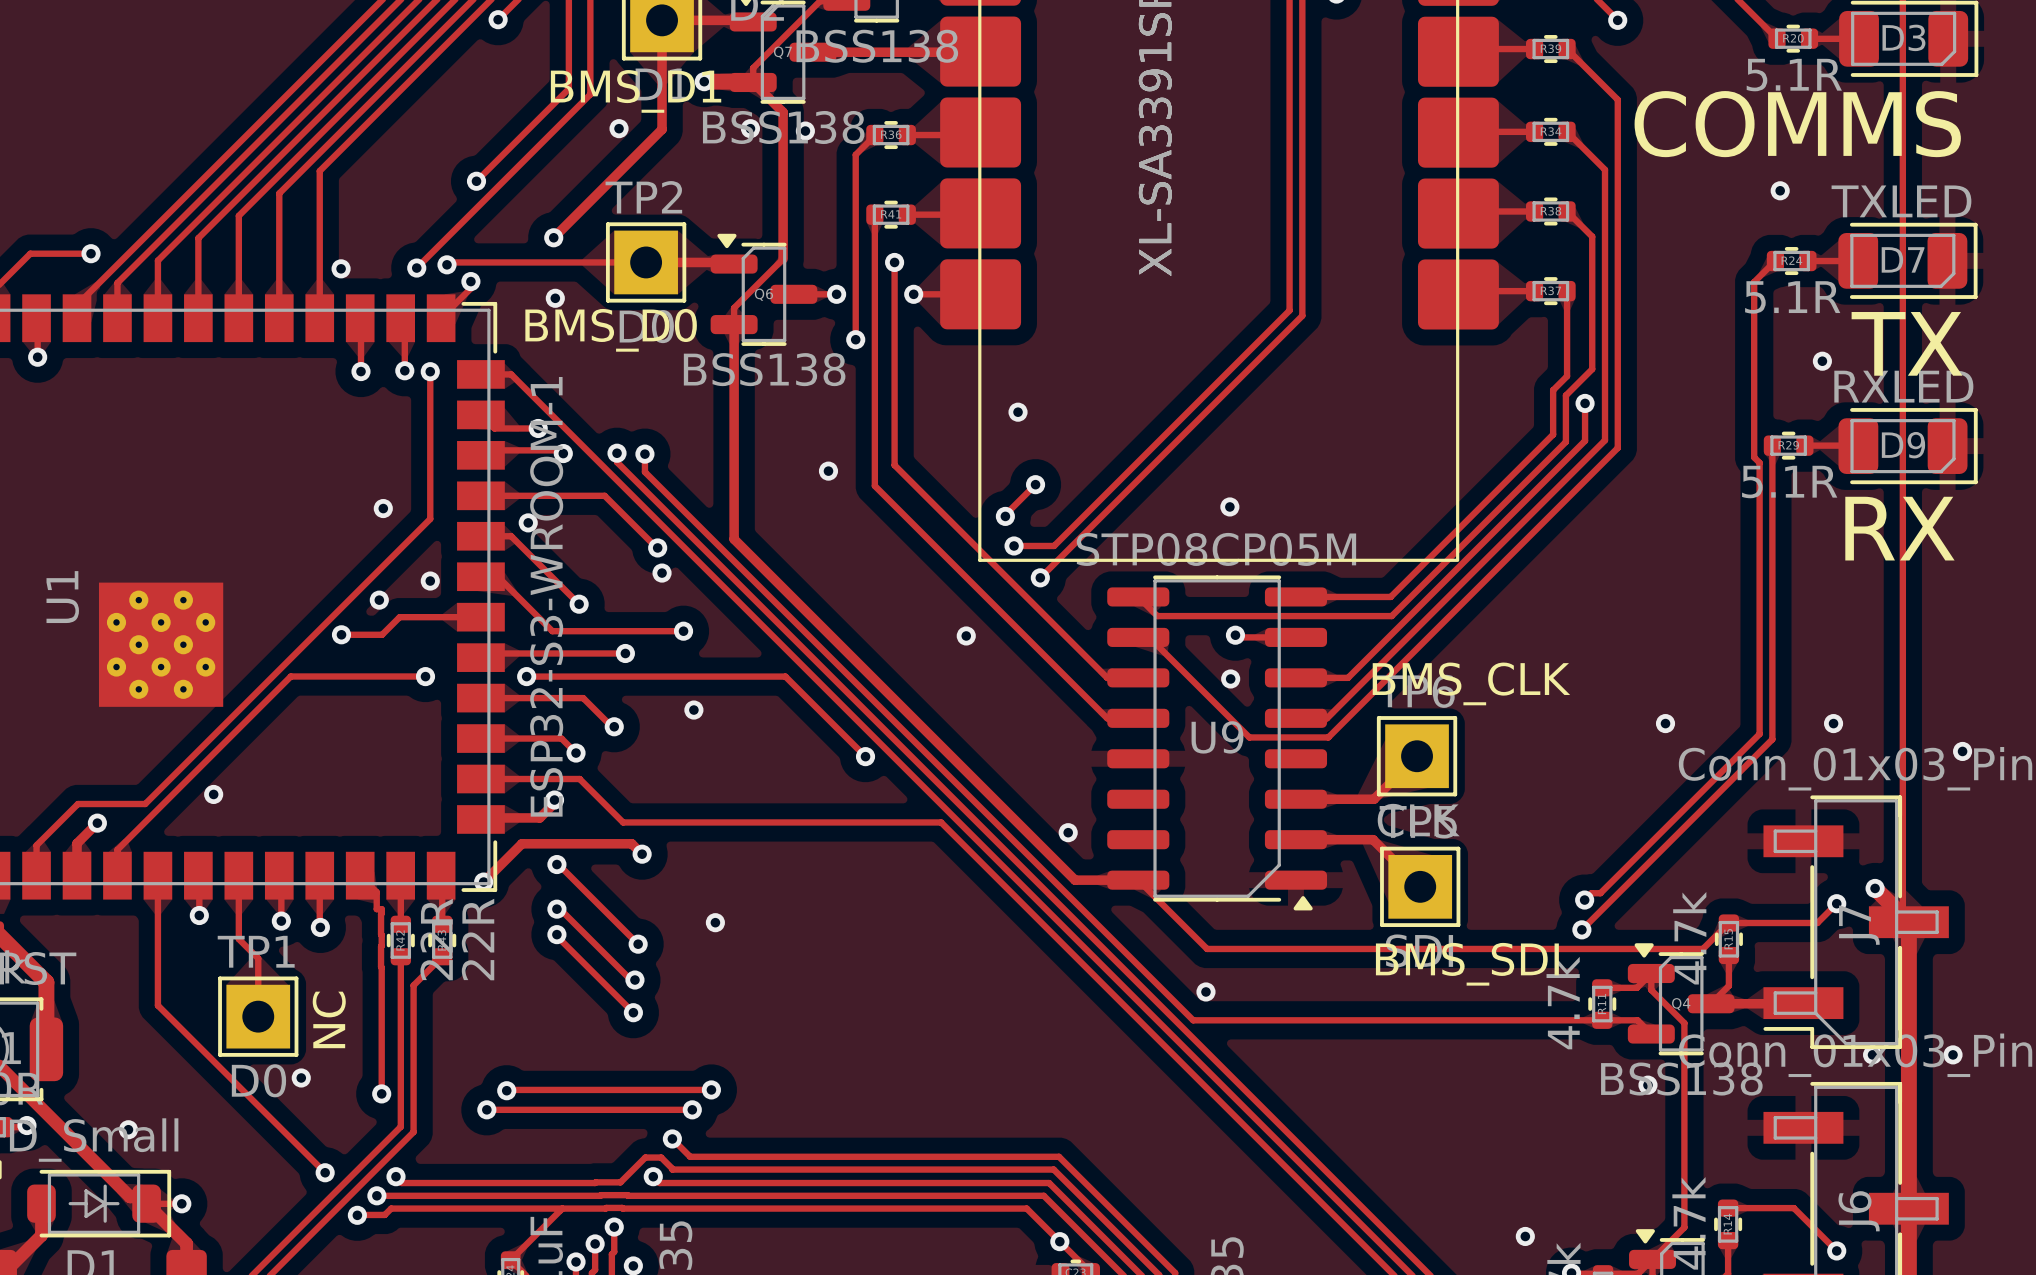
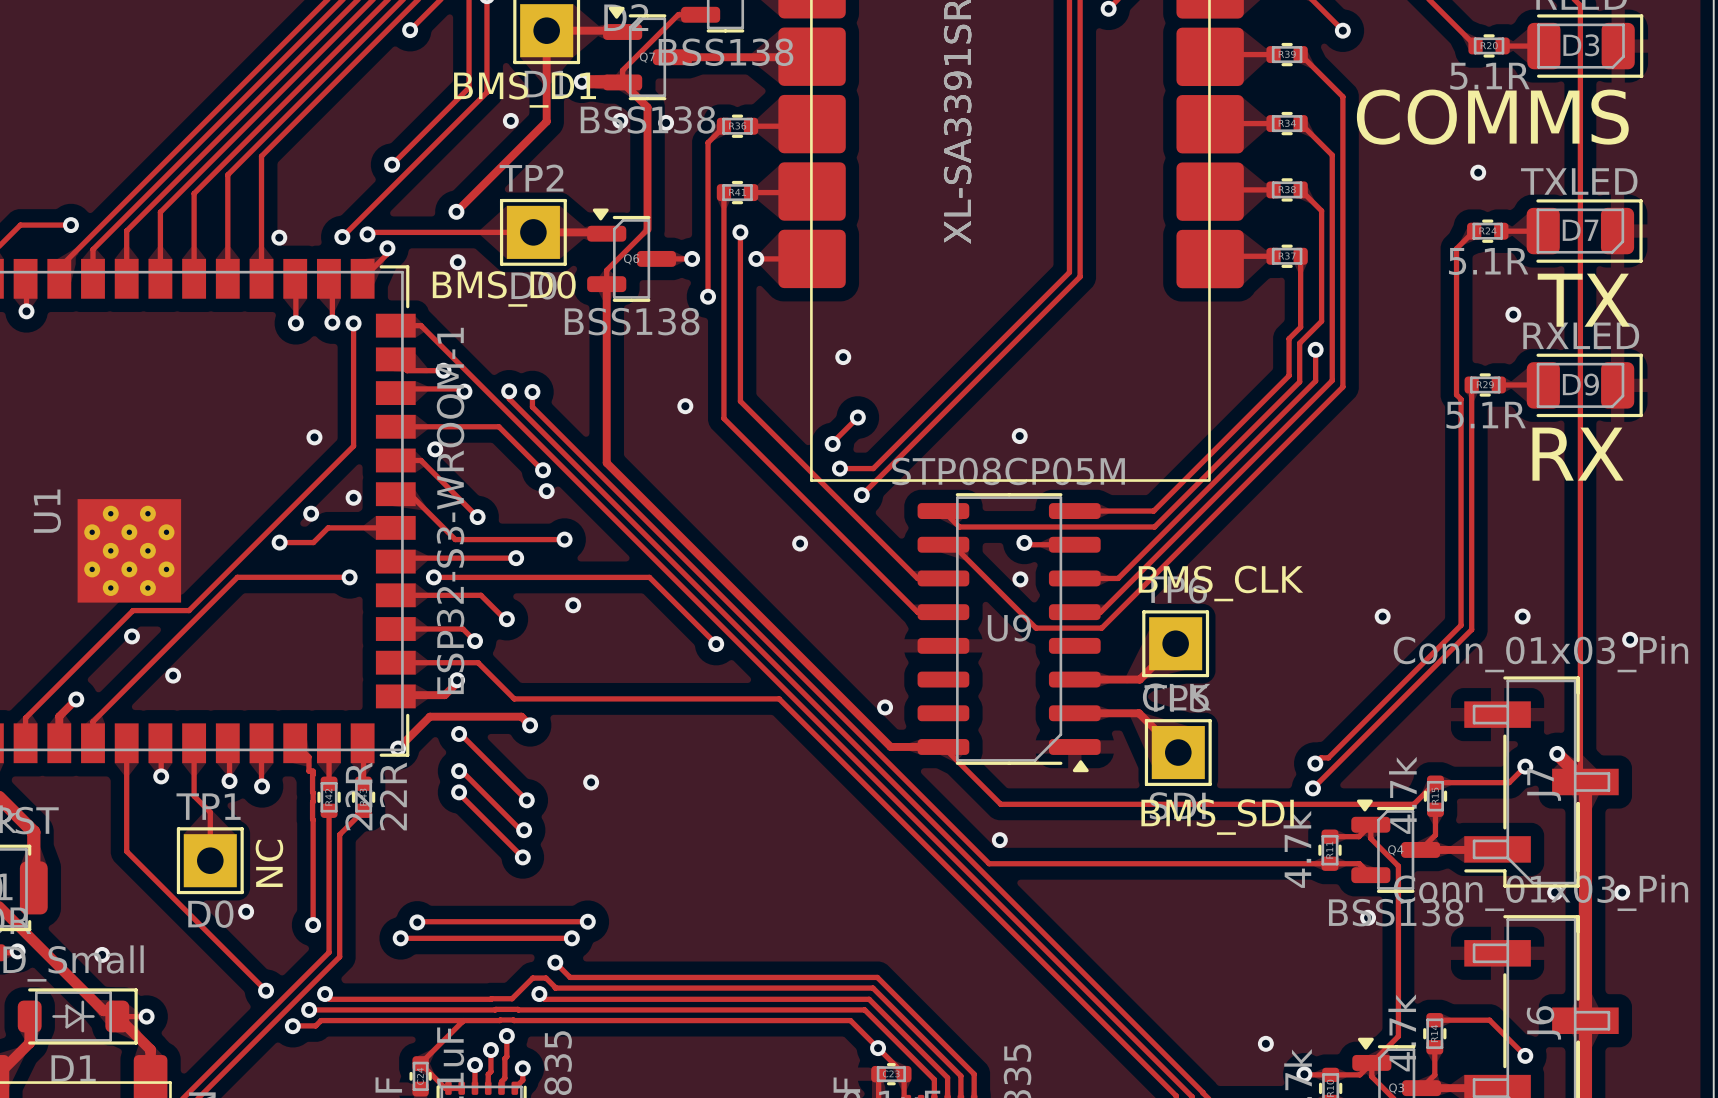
track: (232, 716) (145, 804) (77, 804) -> (189, 610) (133, 610) (60, 683)
via: none -> (132, 636)

